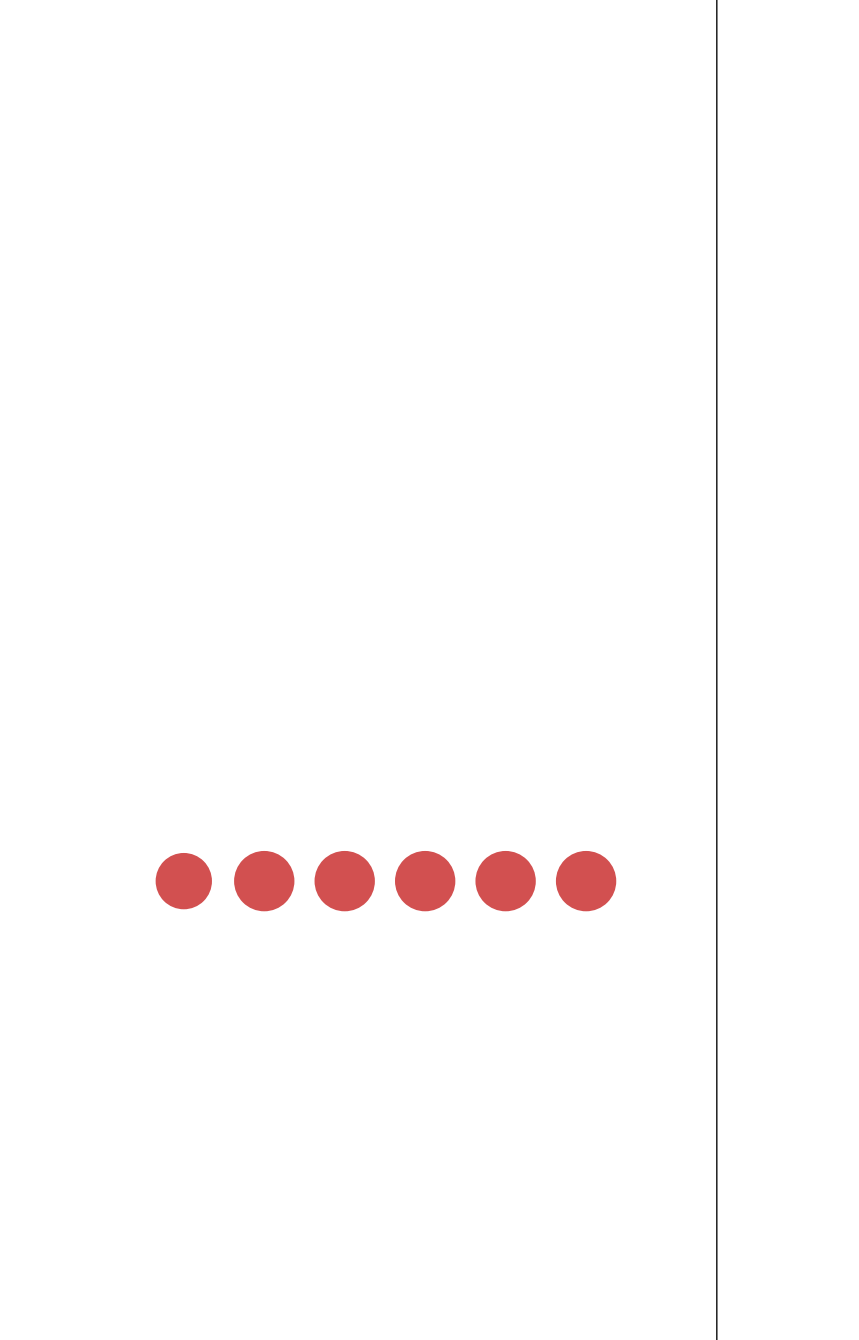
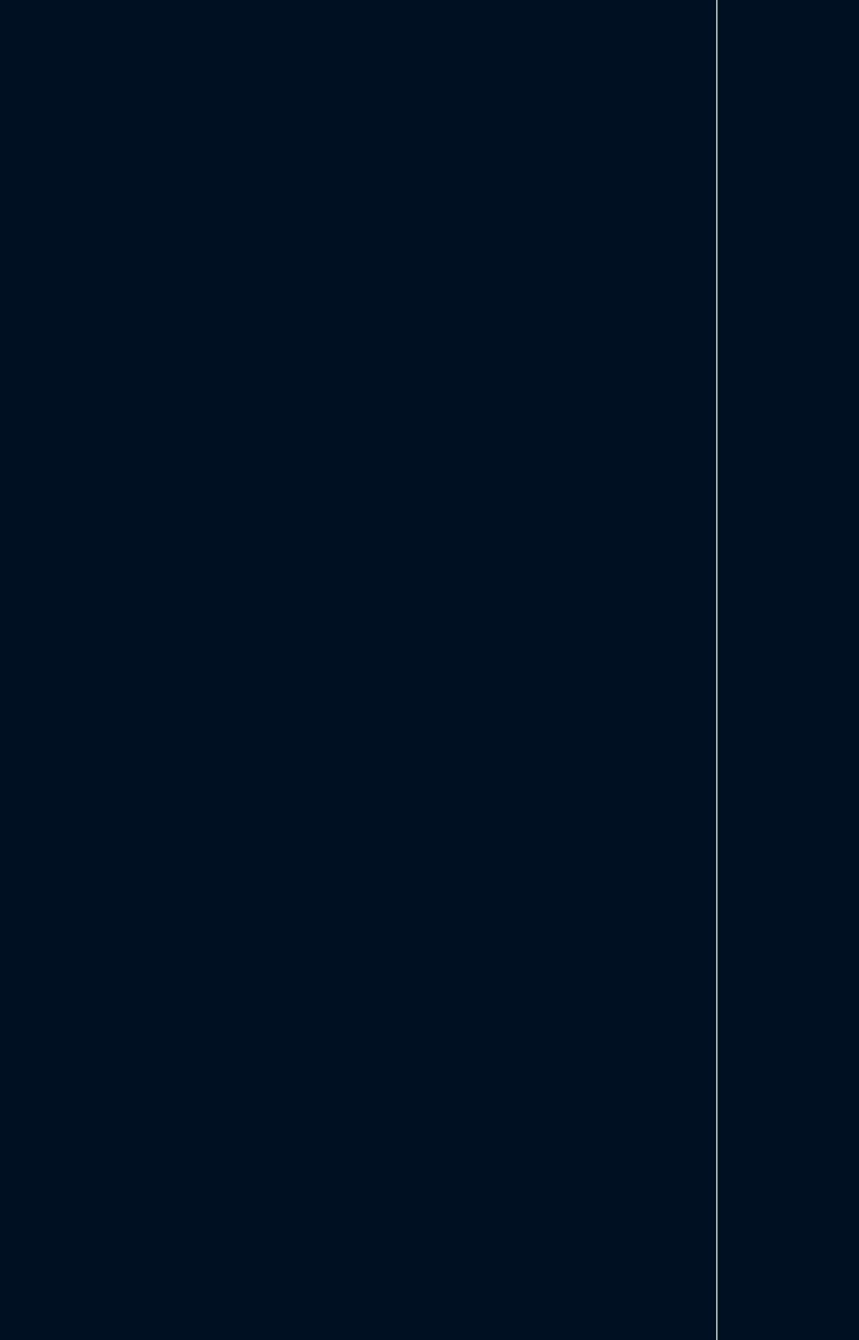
part: (183, 881) -> none
part: (264, 881) -> none
part: (344, 881) -> none
part: (425, 881) -> none
part: (505, 881) -> none
part: (586, 881) -> none

